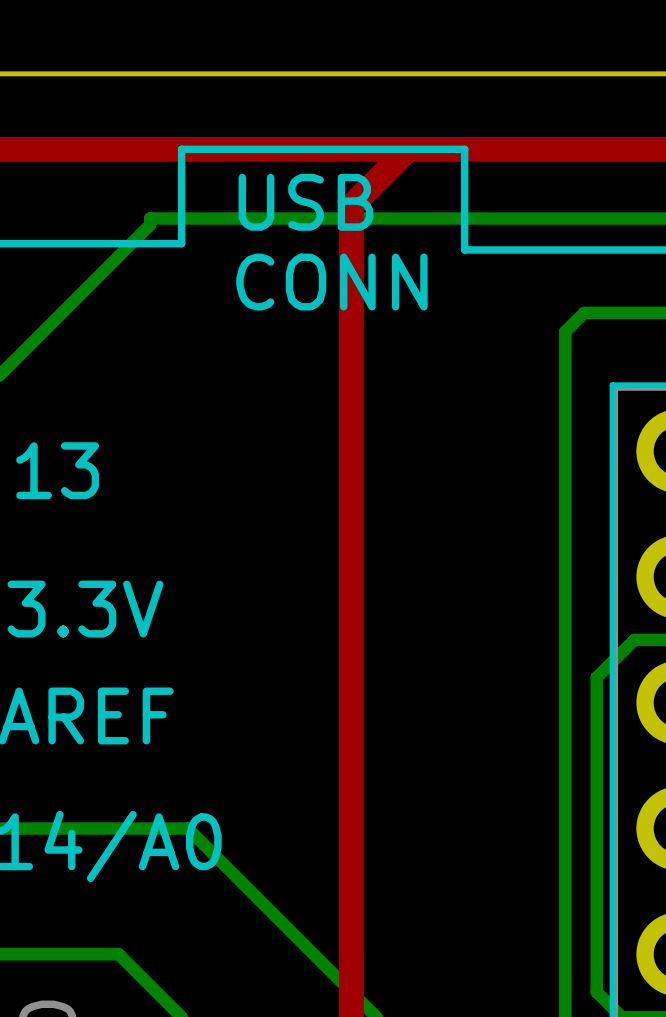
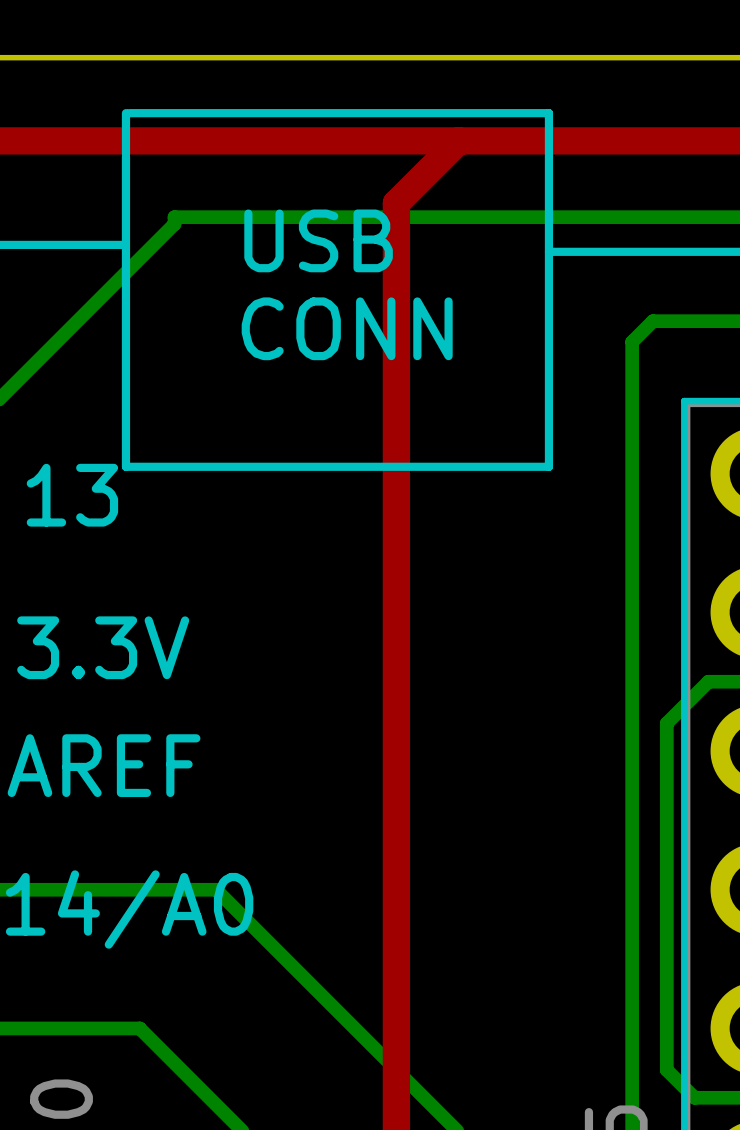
line: none -> (125, 113) (125, 466) (548, 466) (548, 113) (129, 113)
text position: USB (306, 202) -> USB (318, 240)
line: (106, 243) (181, 243) (181, 149) (464, 149) (464, 249) (489, 249) -> none
text position: CONN (331, 282) -> CONN (347, 328)

